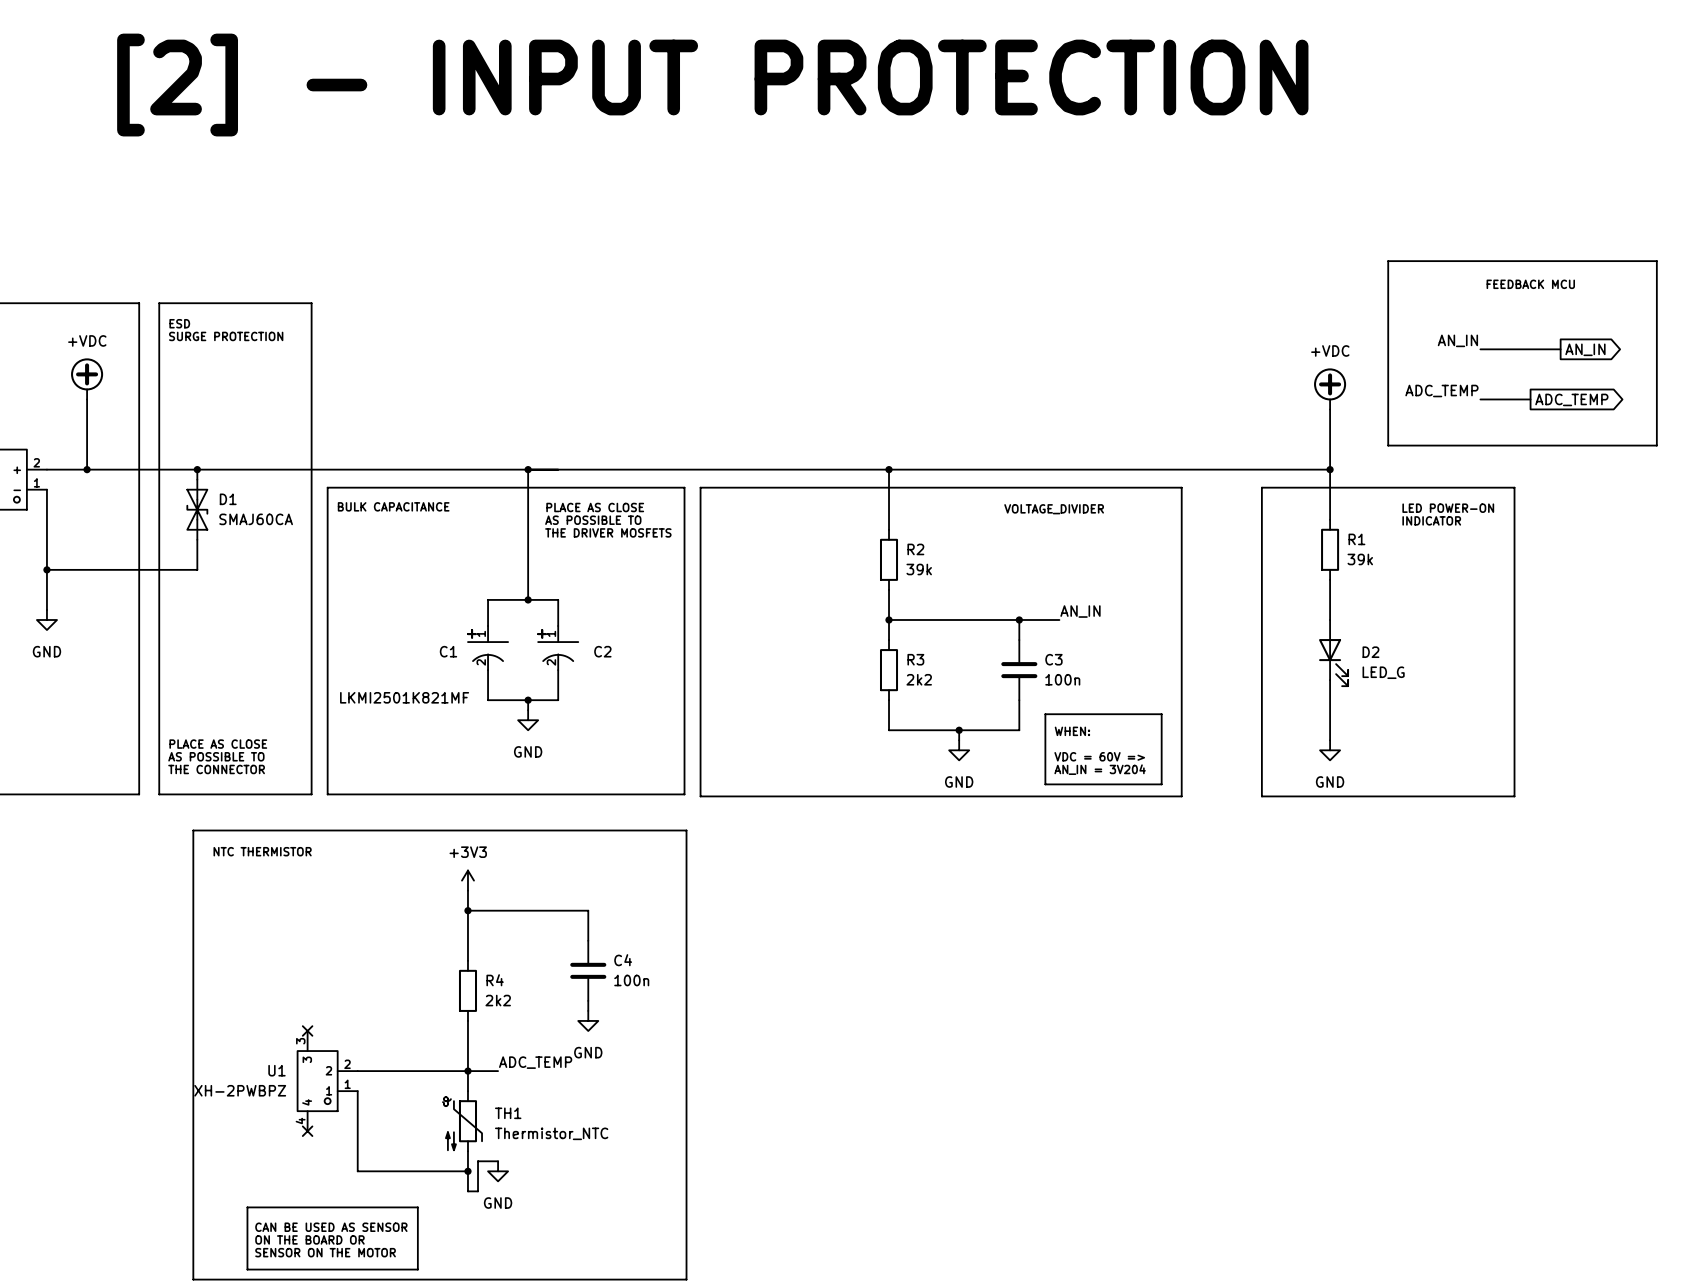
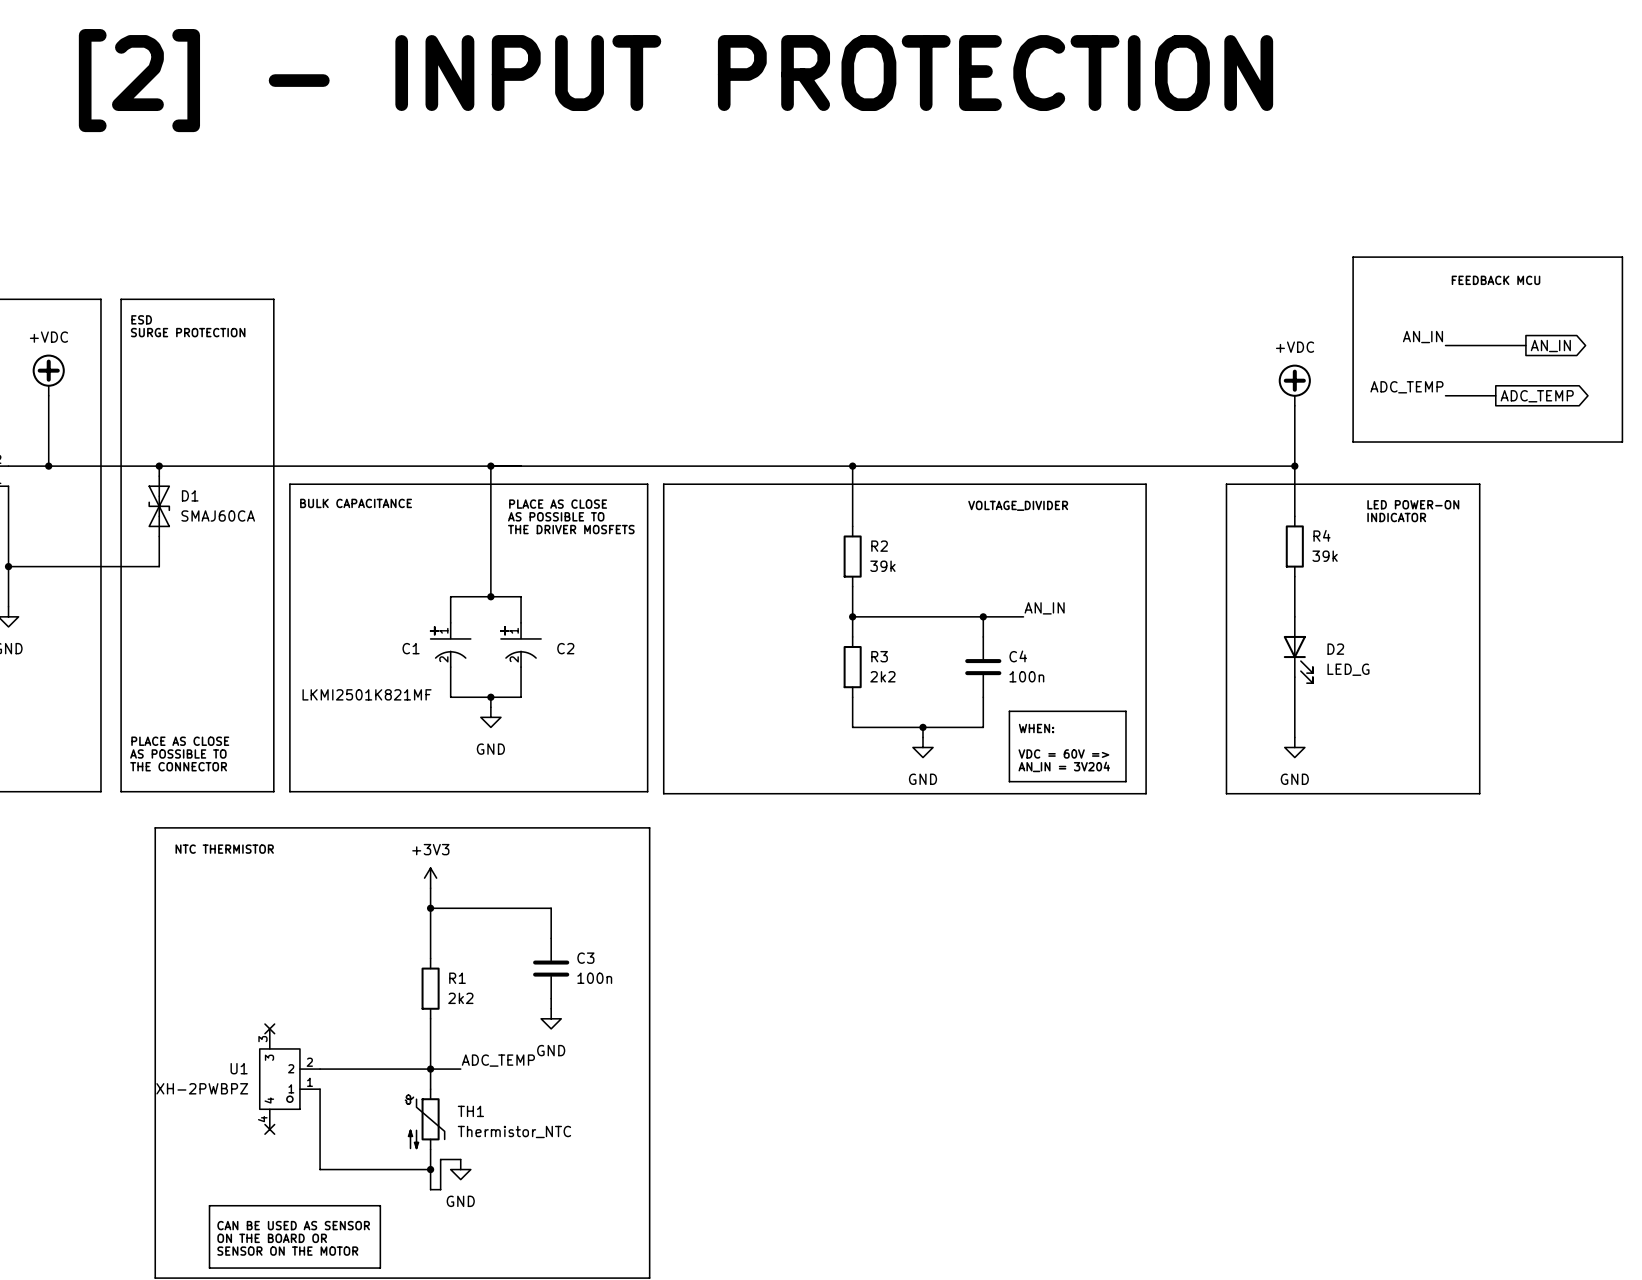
R1 name: R1 (1356, 539) -> R4 (1321, 535)
C3 name: C3 (1053, 659) -> C4 (1018, 656)
C4 name: C4 (623, 960) -> C3 (585, 958)
R4 name: R4 (495, 980) -> R1 (457, 978)

